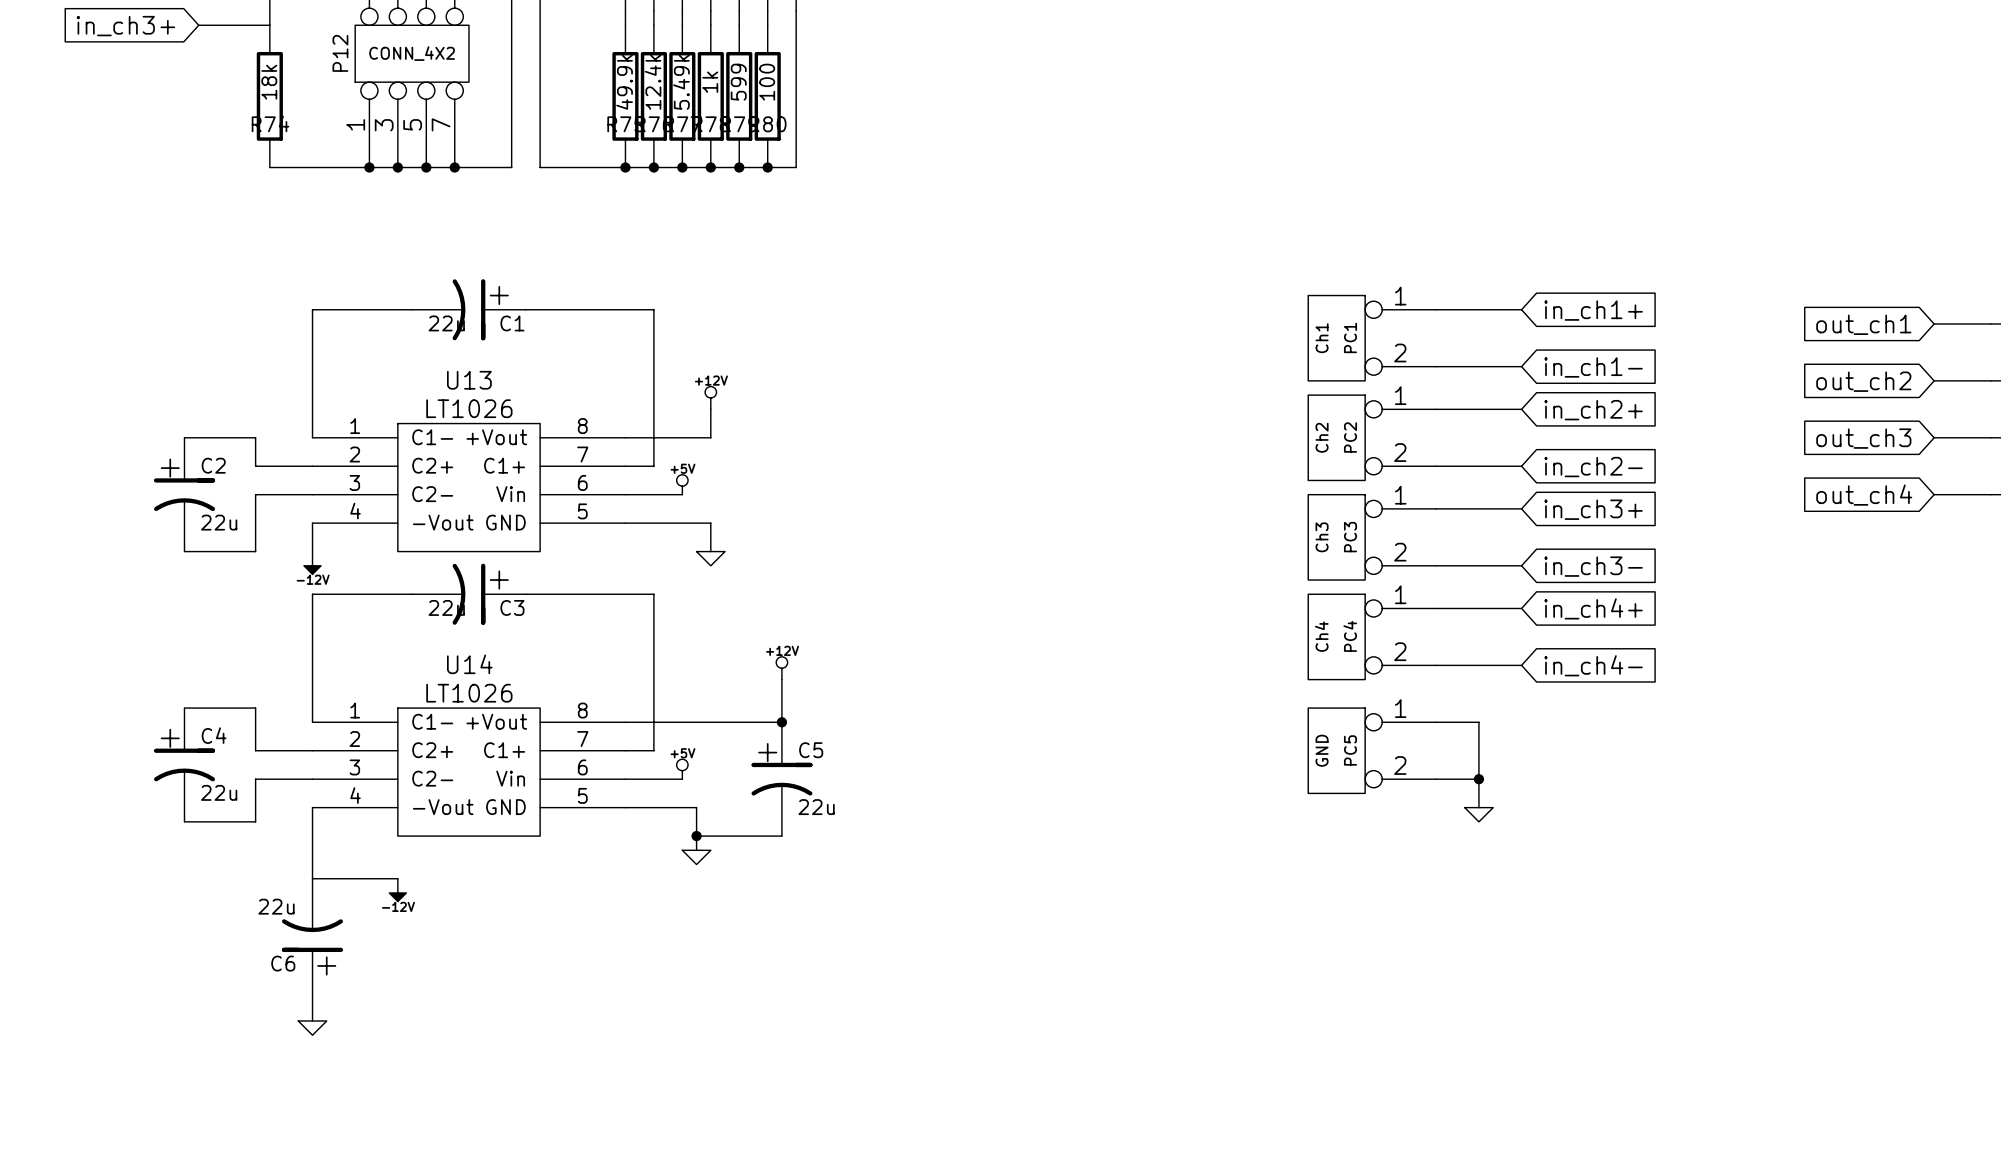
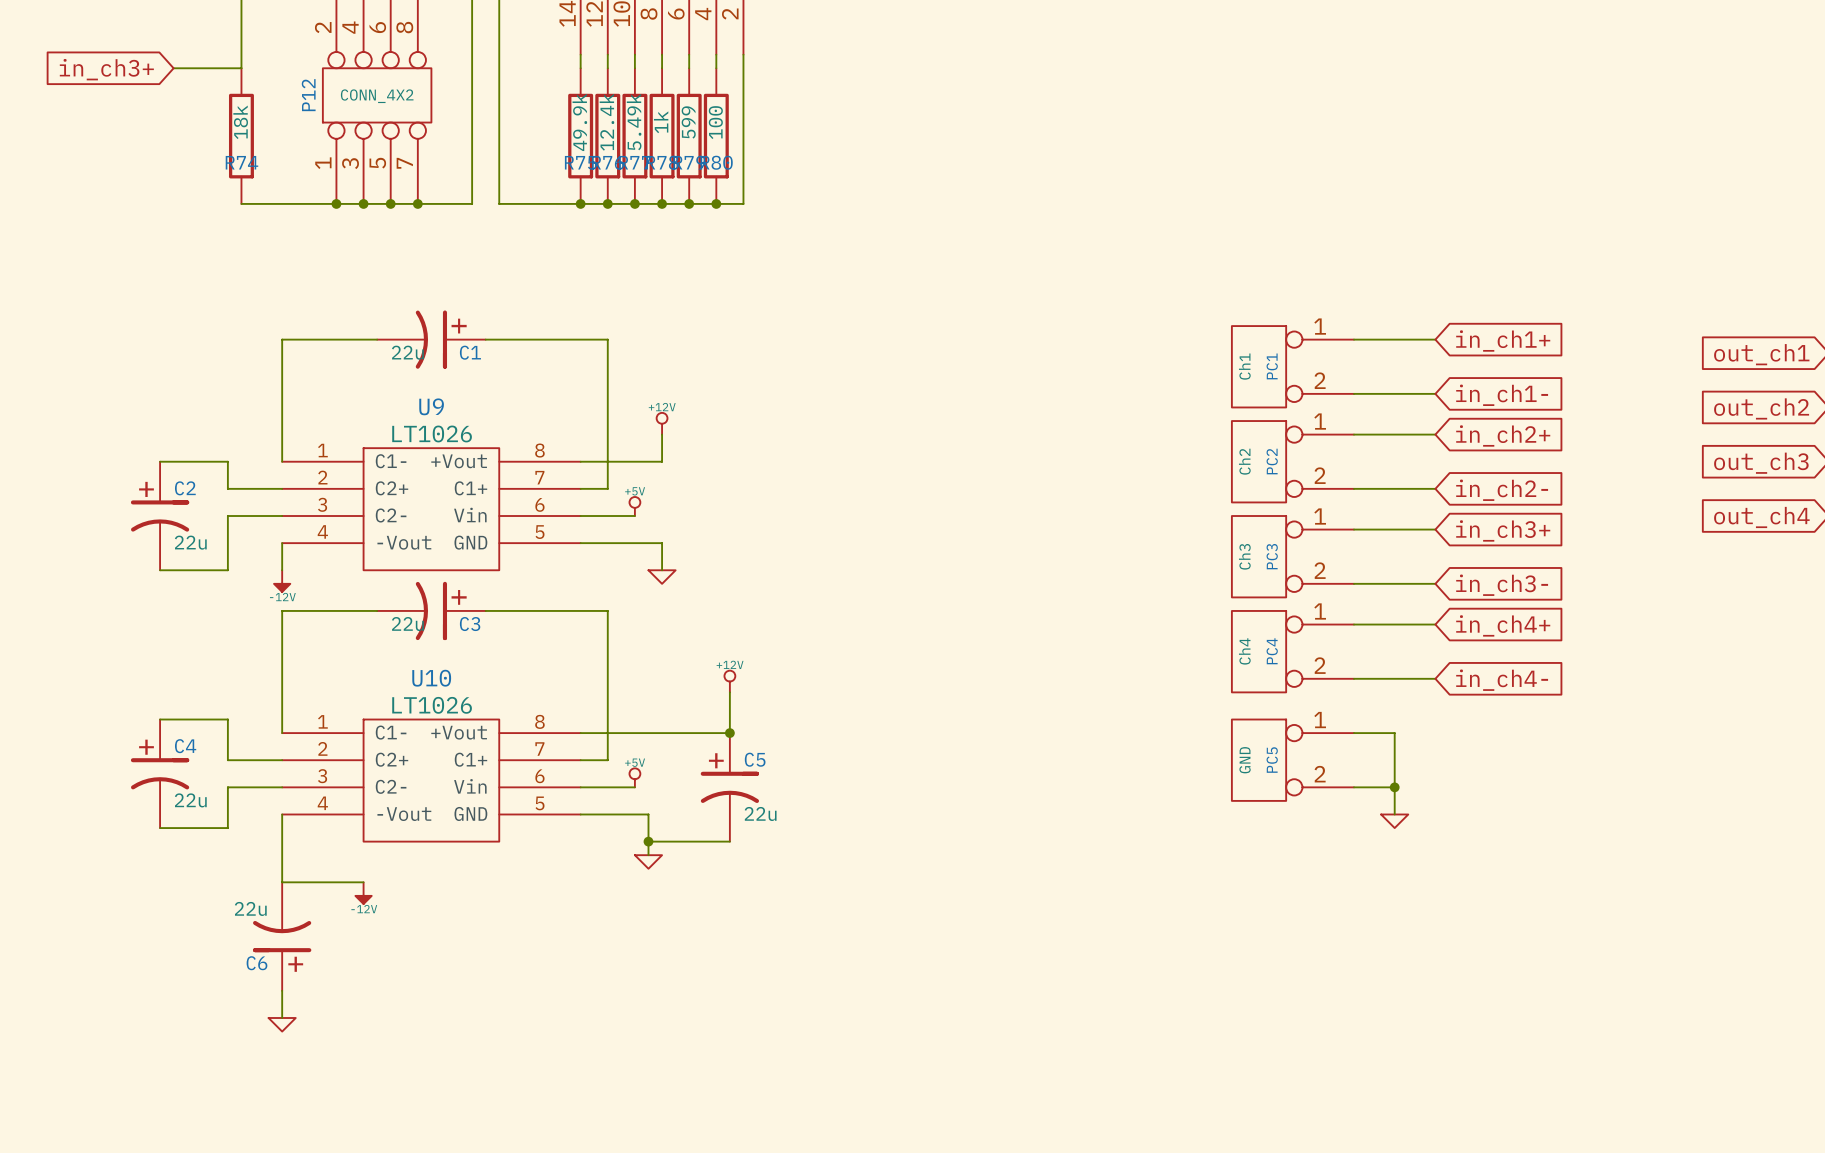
U13 name: U13 (469, 380) -> U9 (431, 406)
U14 name: U14 (469, 664) -> U10 (431, 678)

